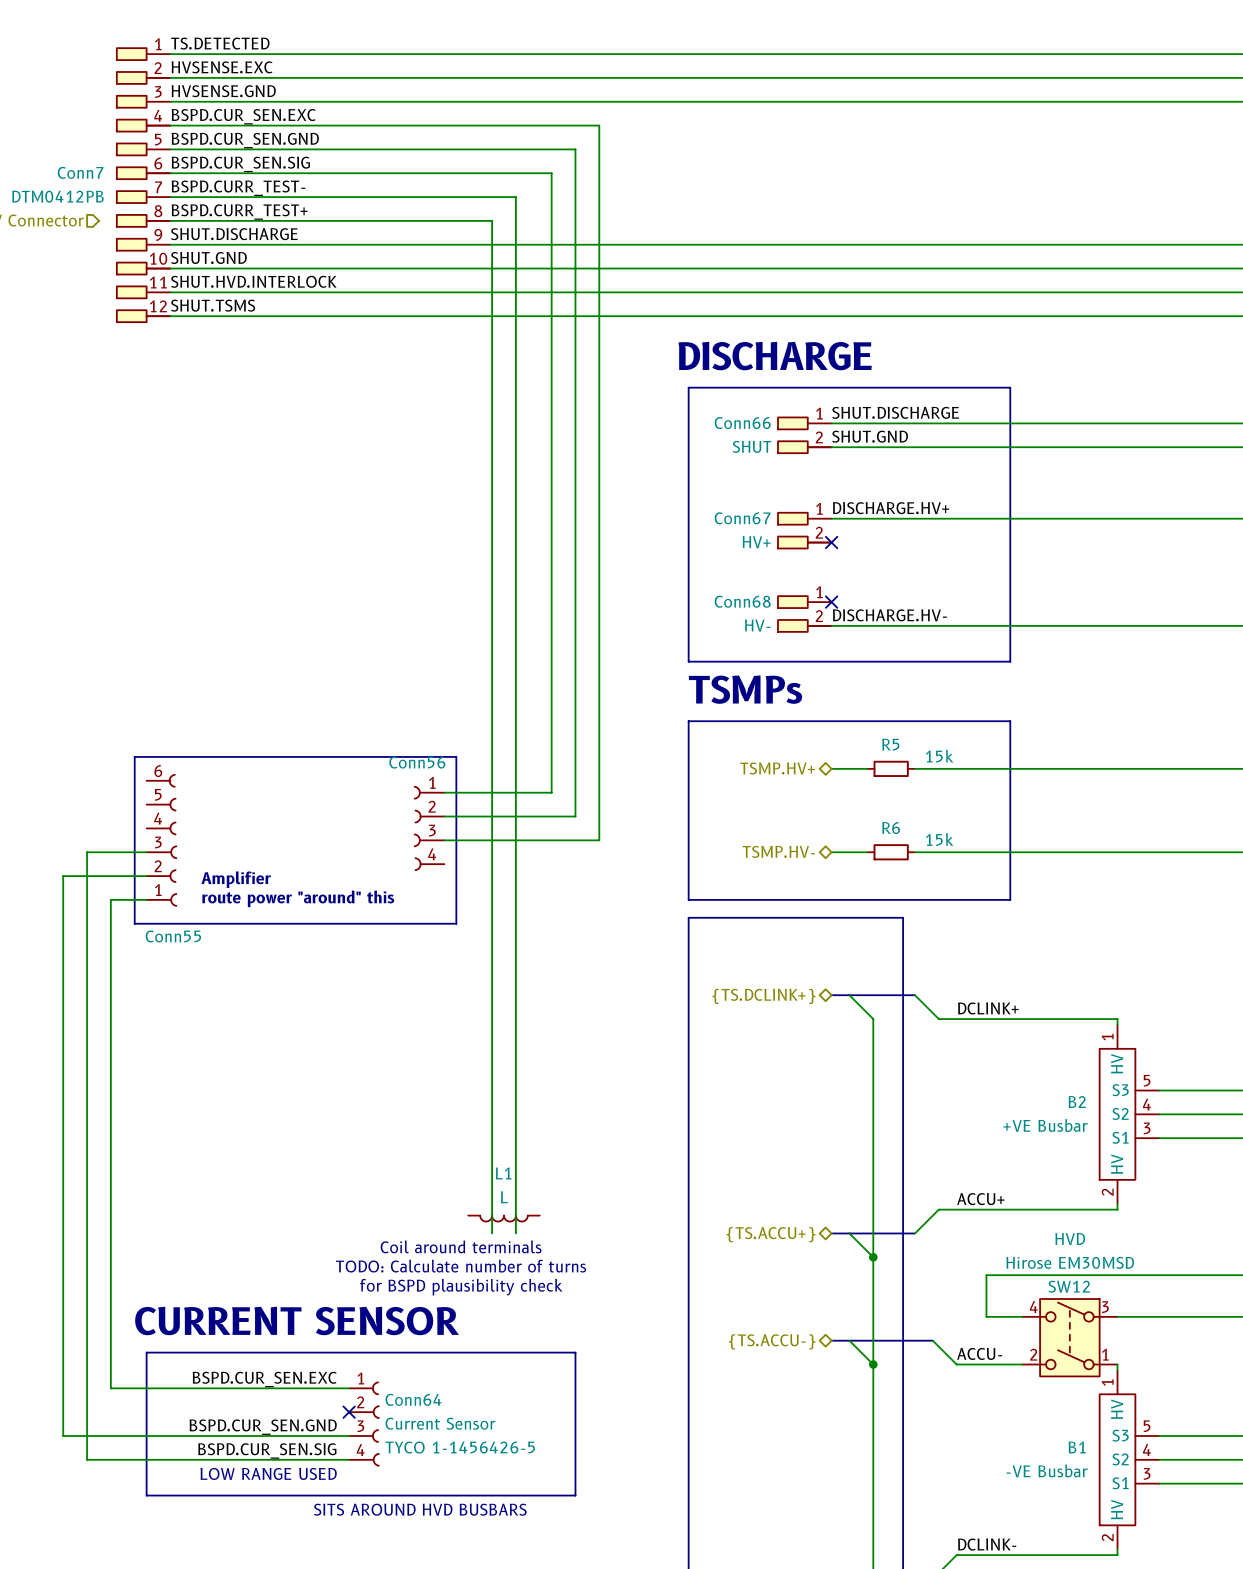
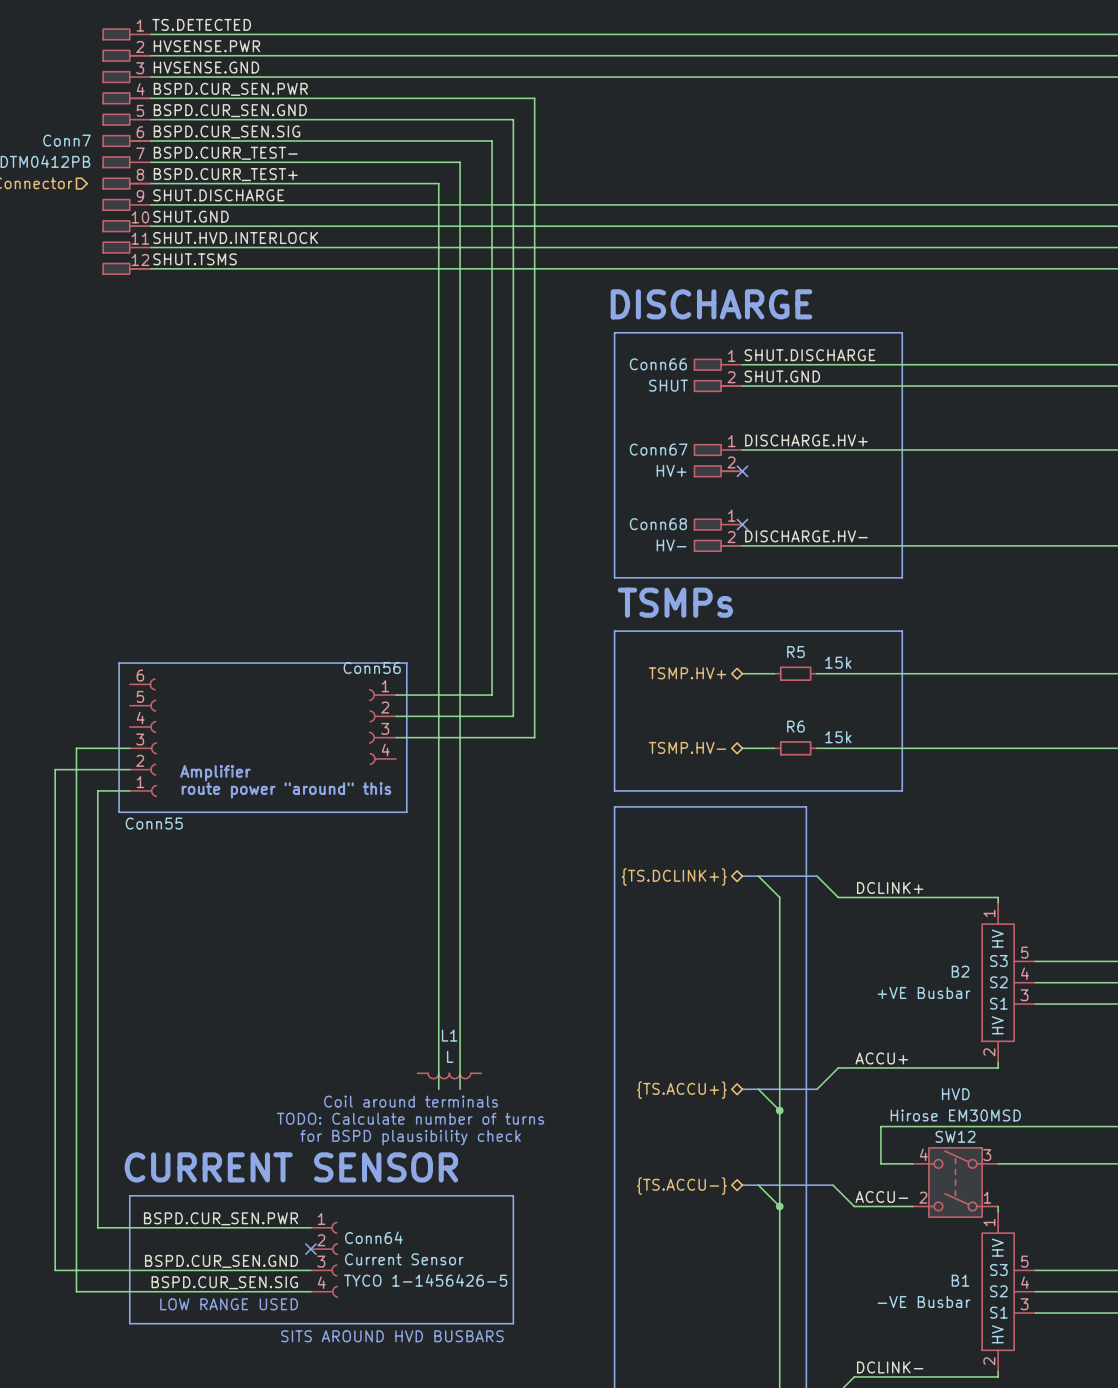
label: HVSENSE.EXC (222, 67) -> HVSENSE.PWR (206, 46)
label: BSPD.CUR_SEN.EXC (243, 116) -> BSPD.CUR_SEN.PWR (230, 89)
label: BSPD.CUR_SEN.EXC (264, 1379) -> BSPD.CUR_SEN.PWR (221, 1218)

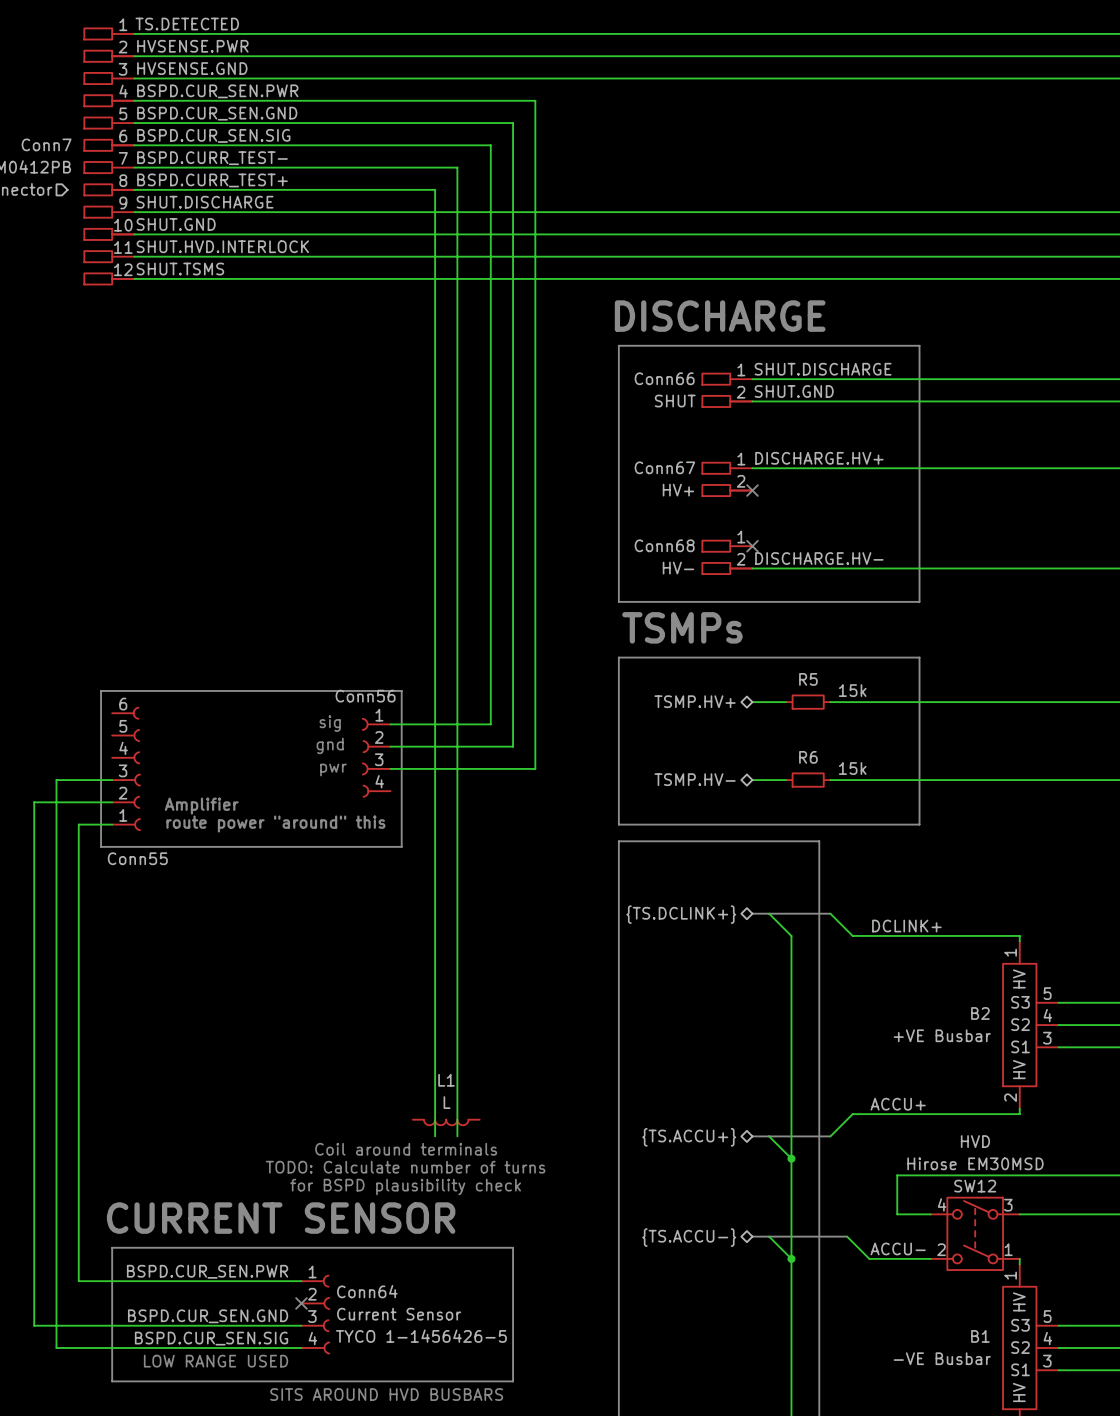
text: none -> sig (330, 723)
text: none -> gnd (330, 745)
text: none -> pwr (333, 770)

